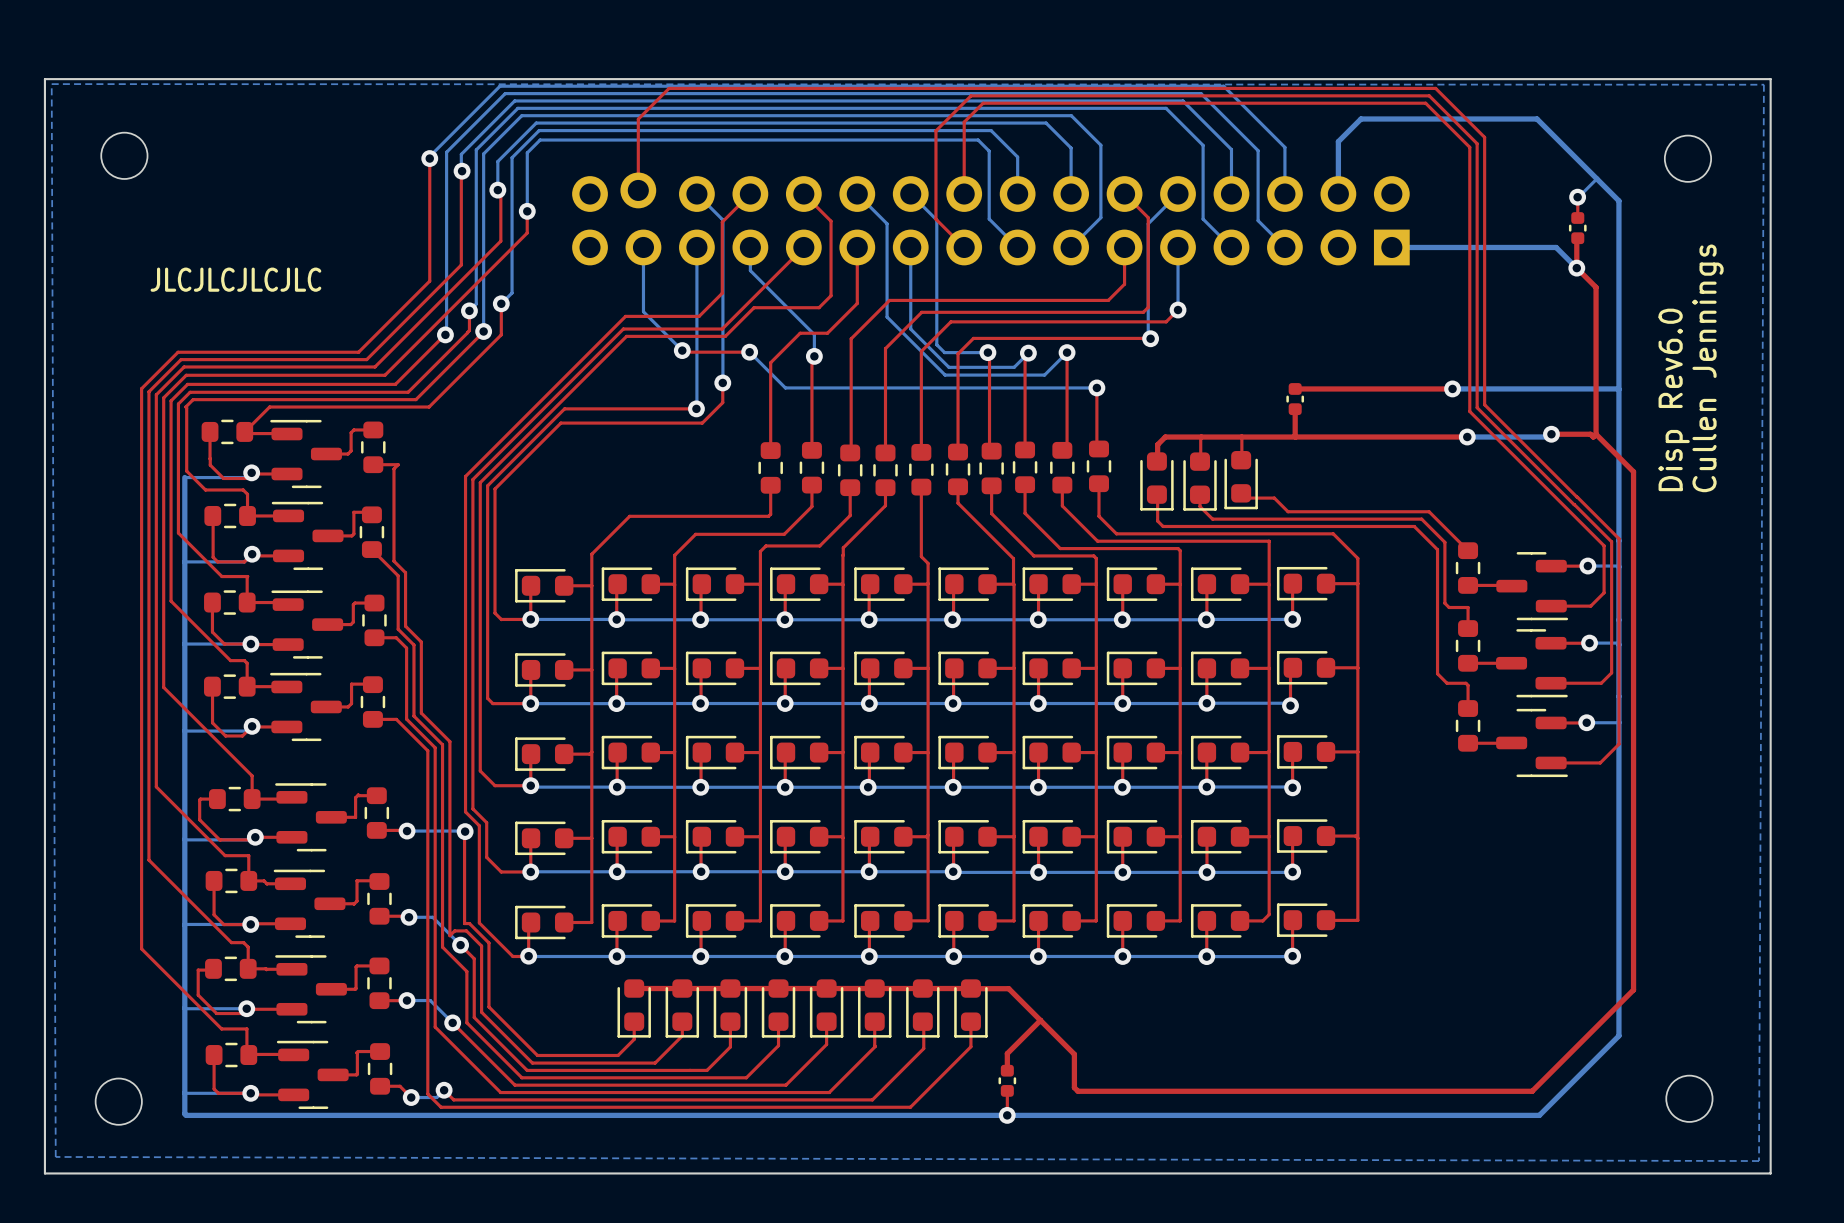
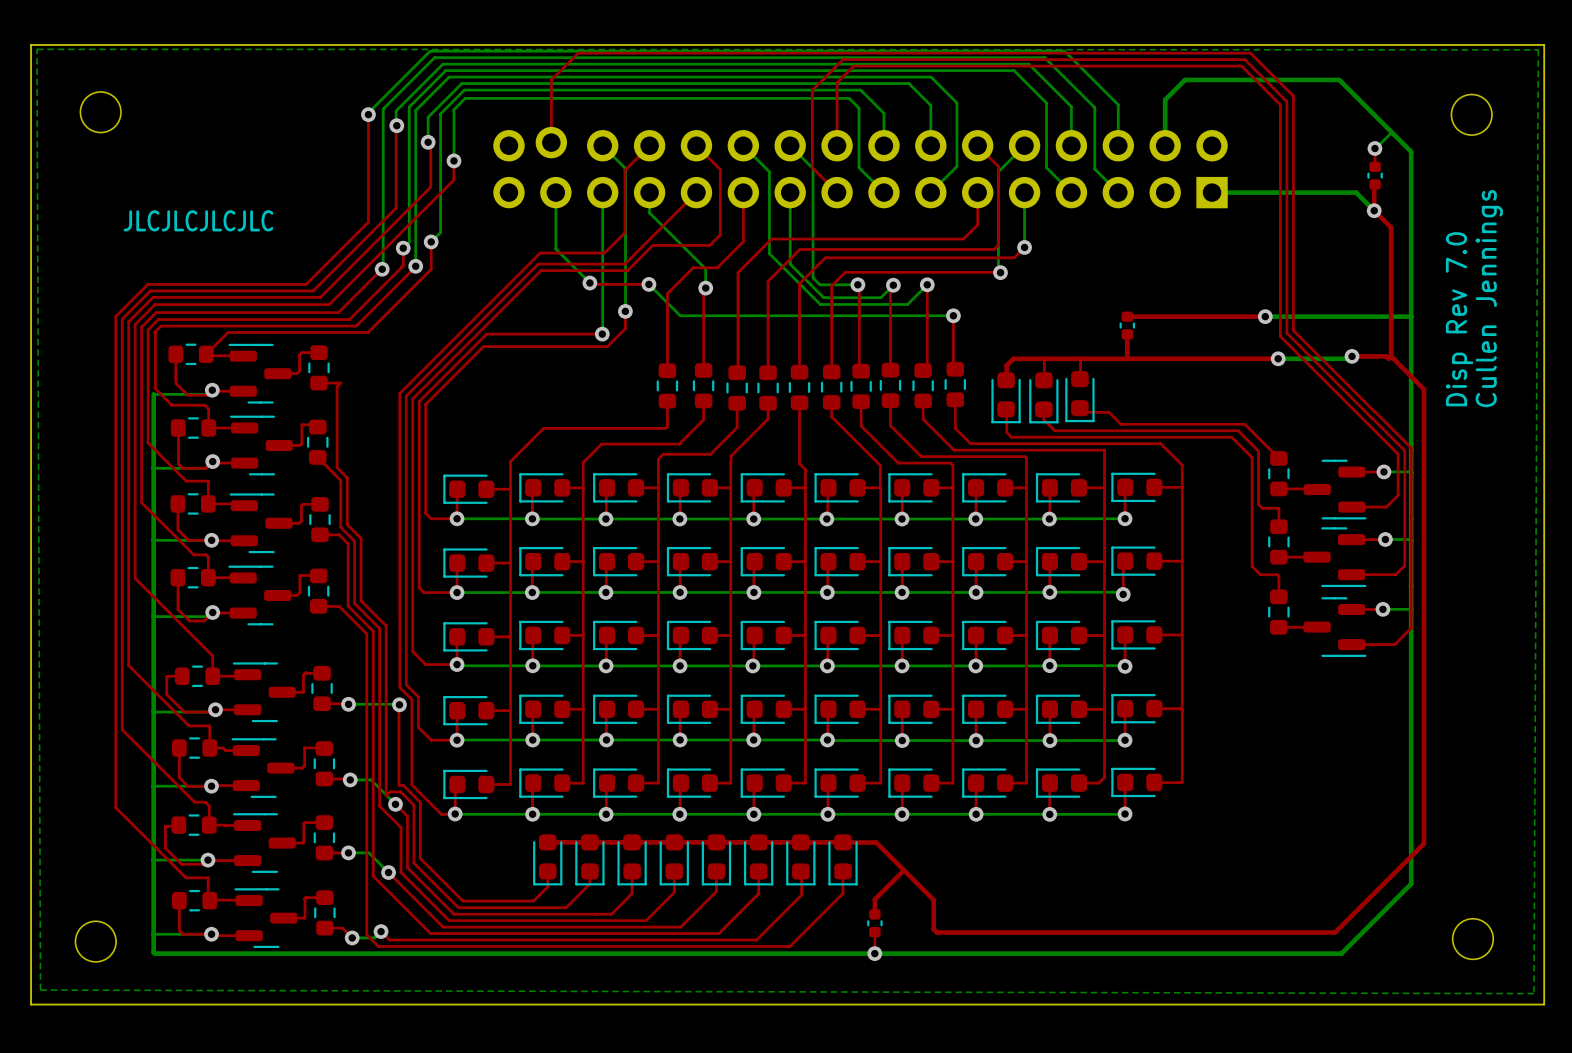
text: Disp Rev6.0 (1674, 399) -> Disp Rev 7.0 (1459, 319)

